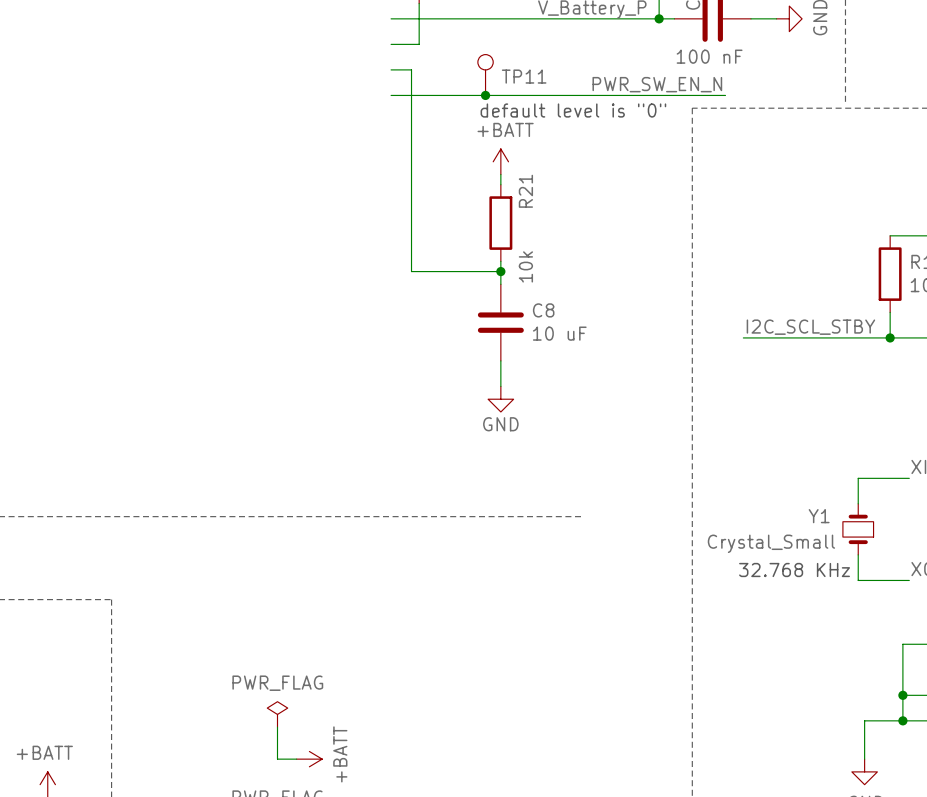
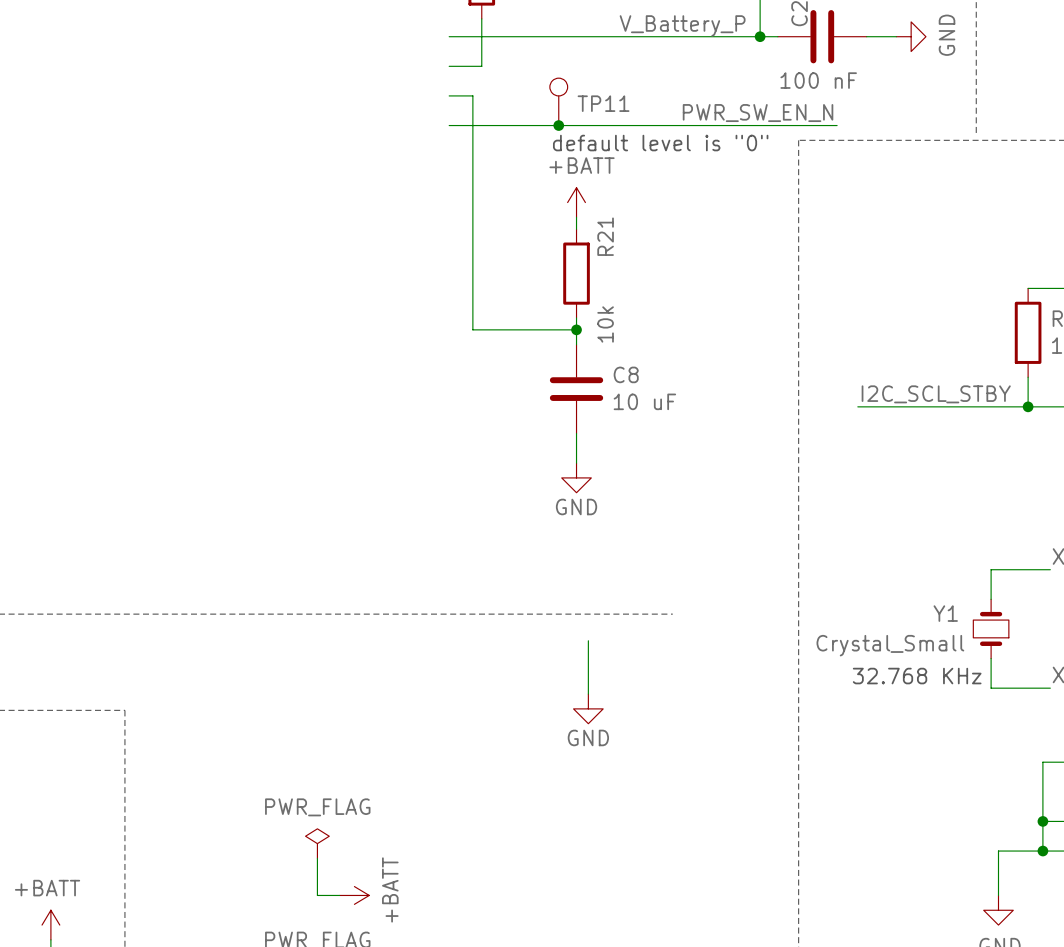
wire: none -> (588, 640) (588, 694)
power symbol: none -> GND (588, 708)

